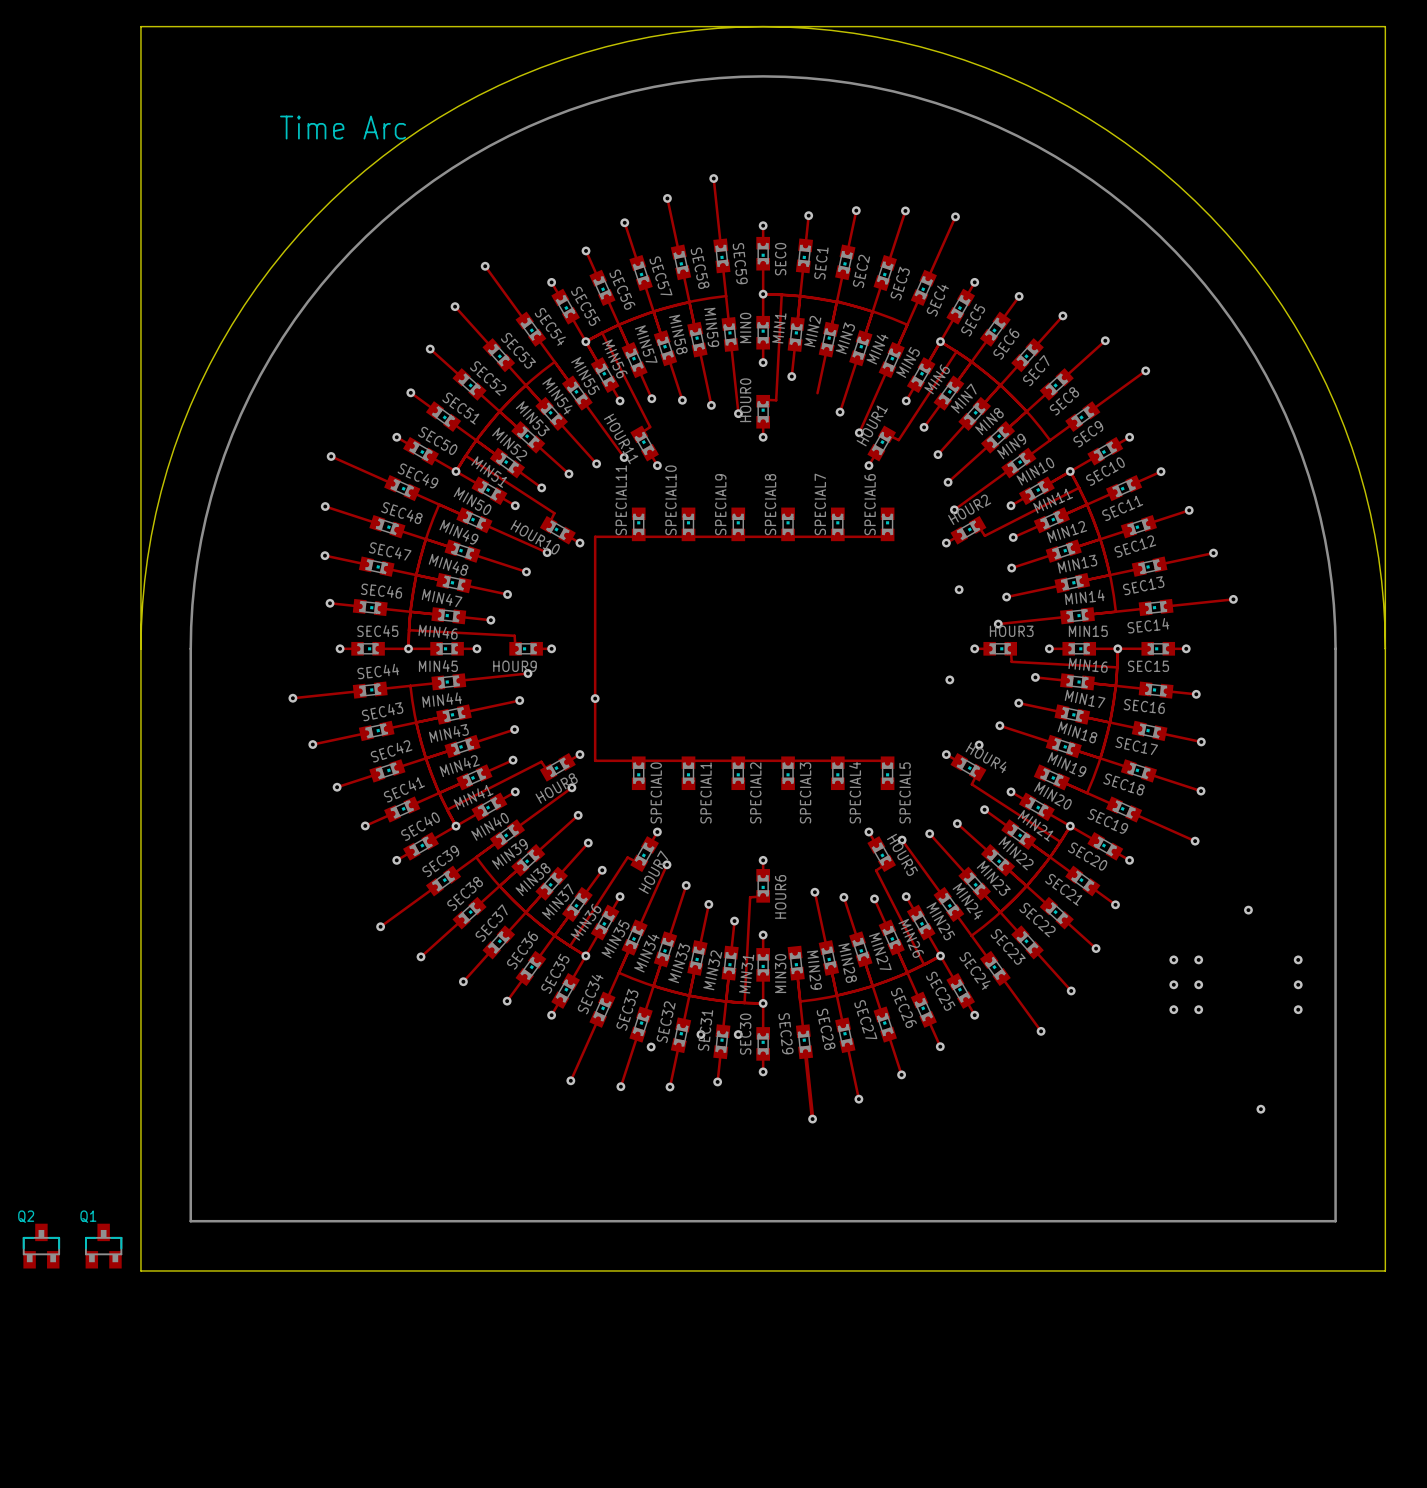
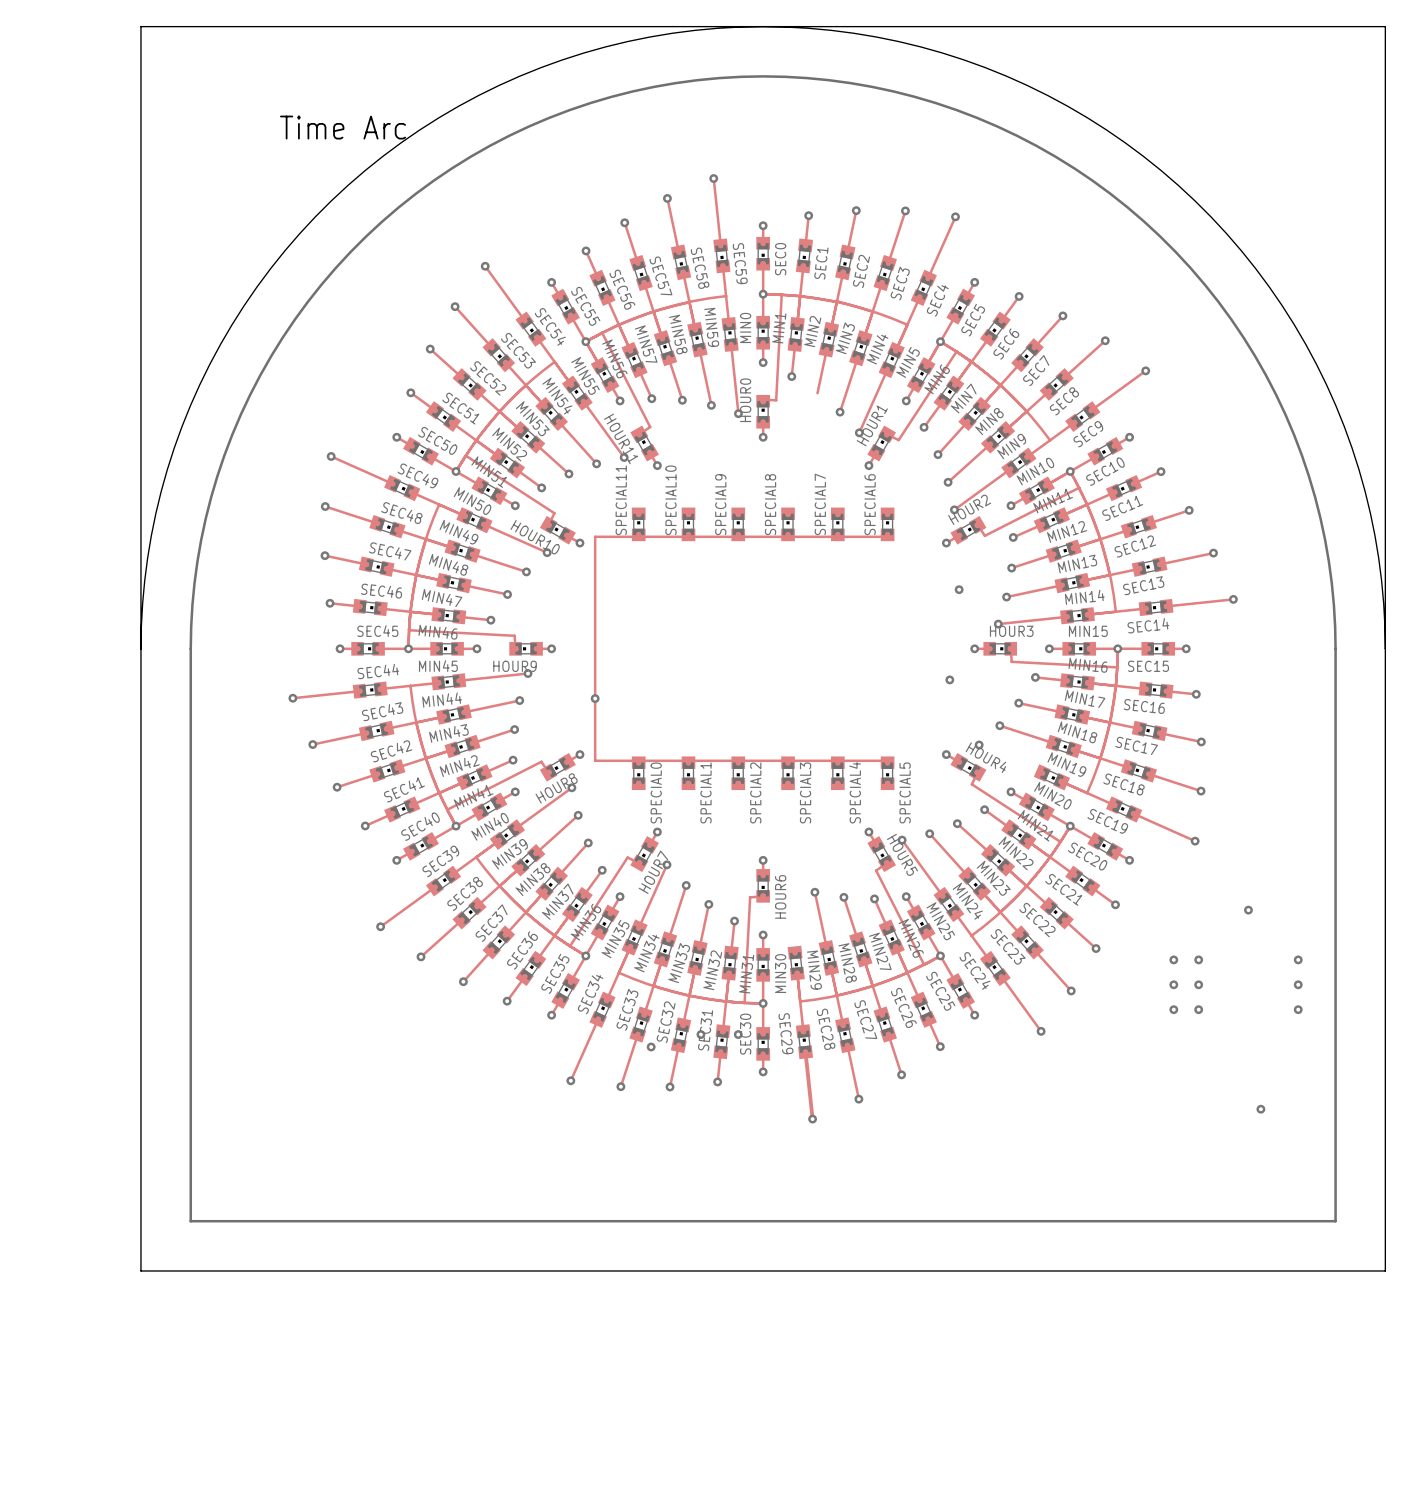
Q2: (41, 1246) -> none
Q1: (103, 1246) -> none

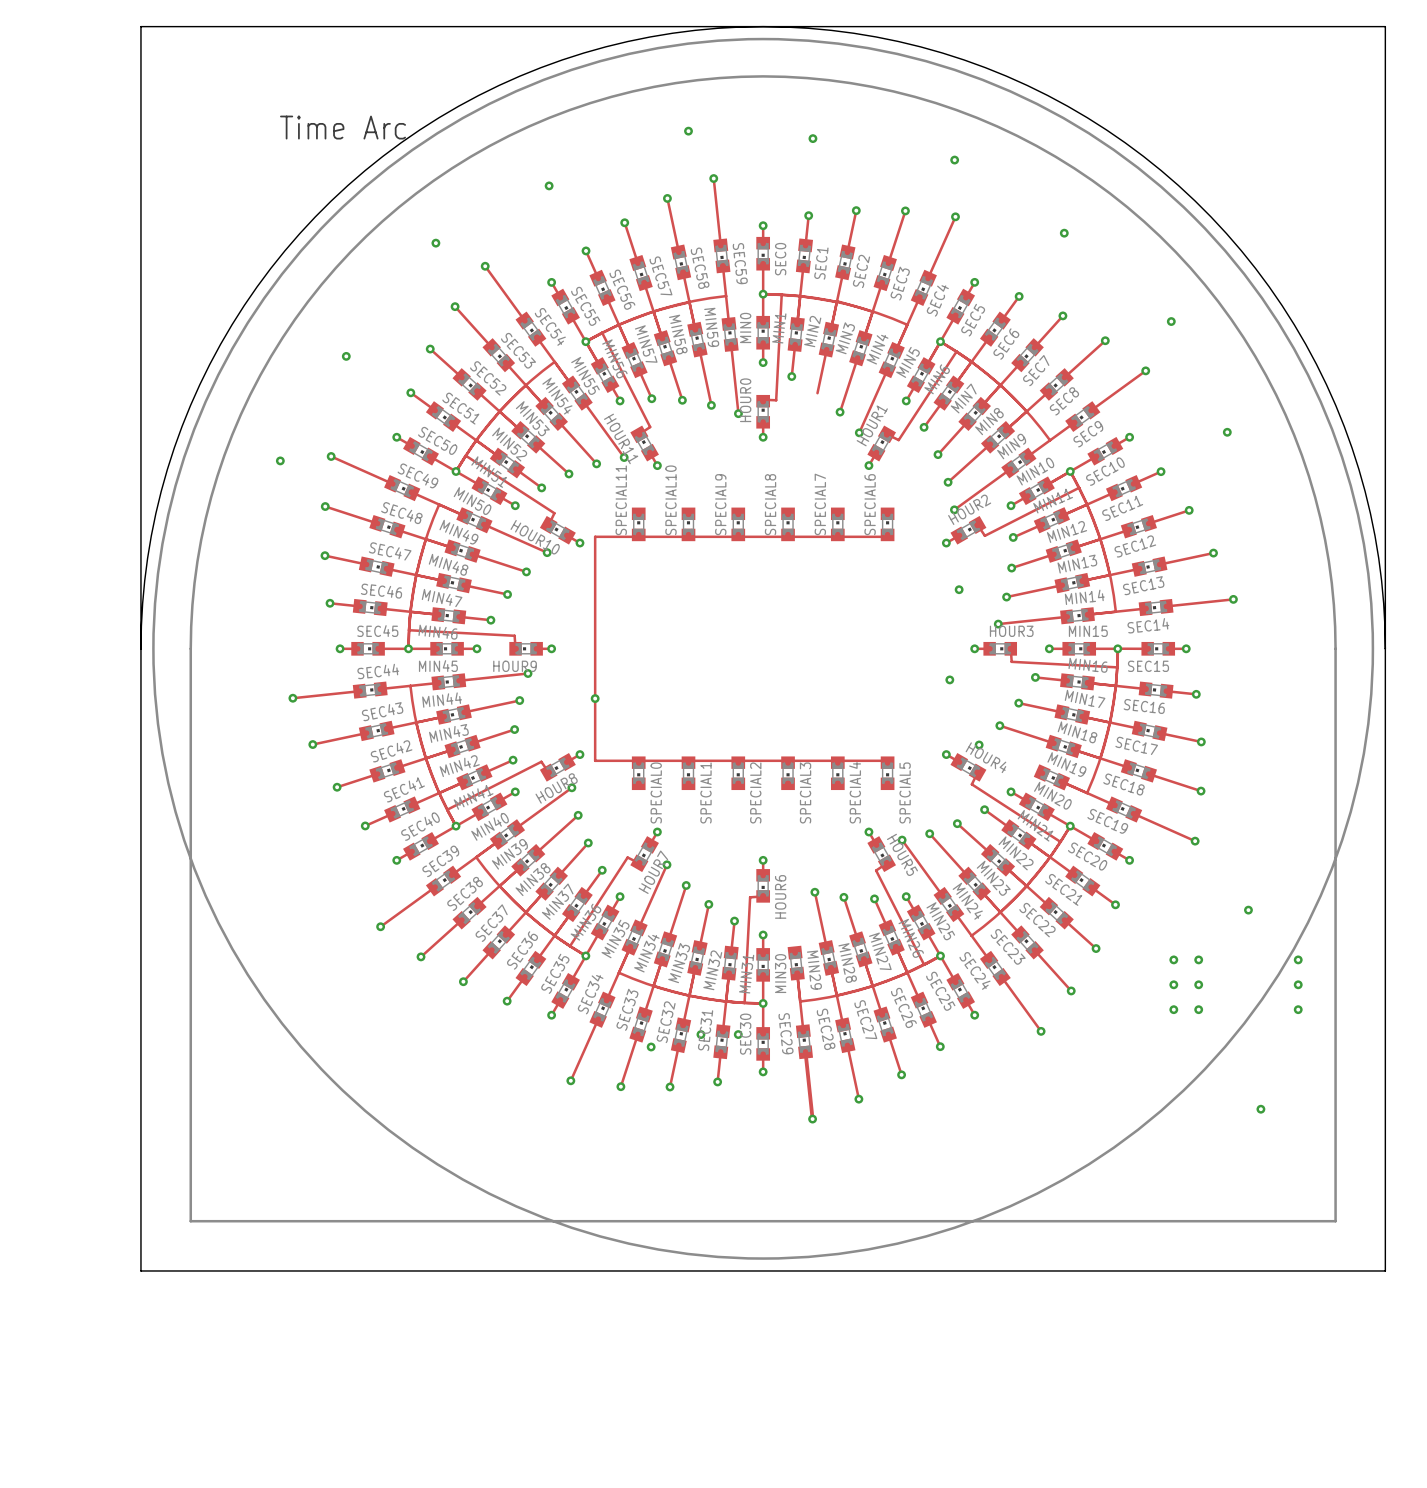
drawing: none -> [152, 37, 1375, 1260]
via: none -> (688, 131)
via: none -> (812, 138)
via: none -> (954, 160)
via: none -> (549, 185)
via: none -> (1064, 233)
via: none -> (435, 243)
via: none -> (1171, 321)
via: none -> (346, 356)
via: none -> (1227, 432)
via: none -> (280, 460)

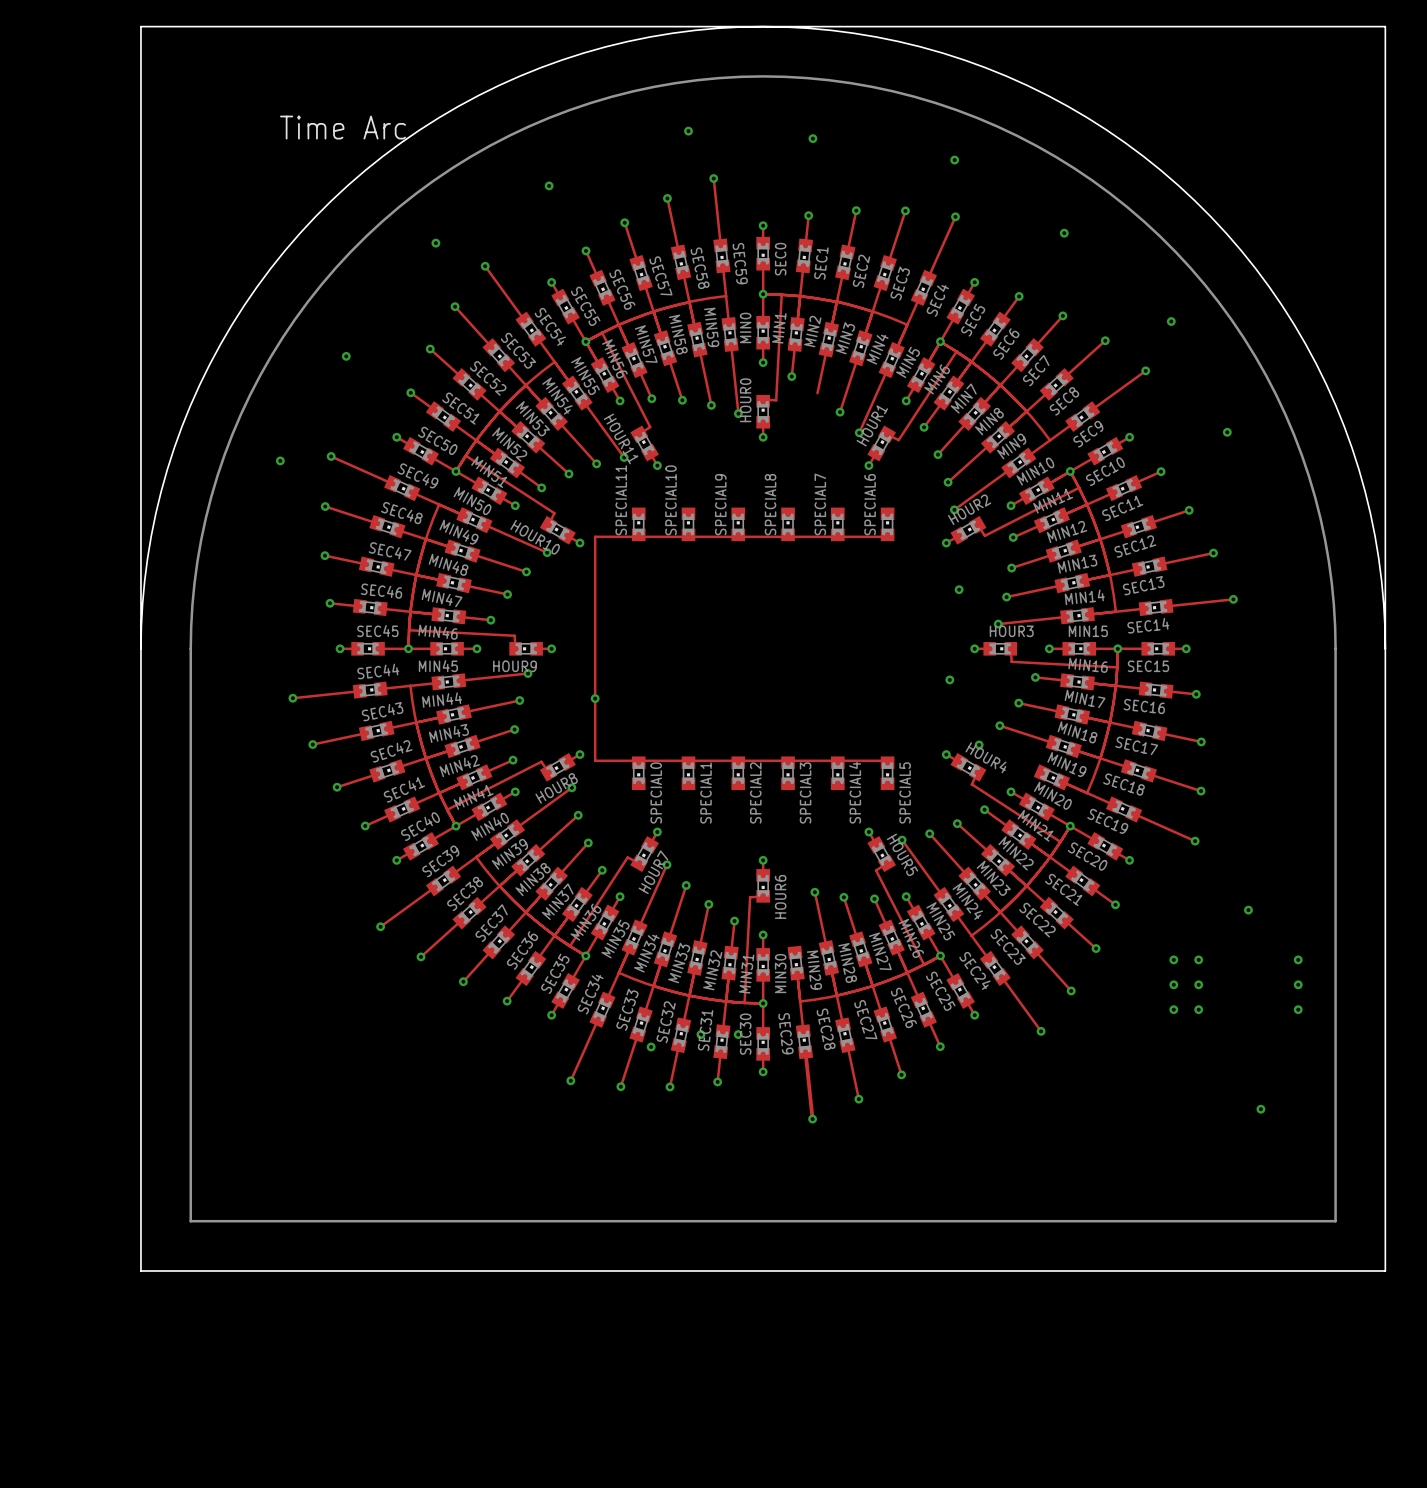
drawing: [152, 37, 1375, 1260] -> none

